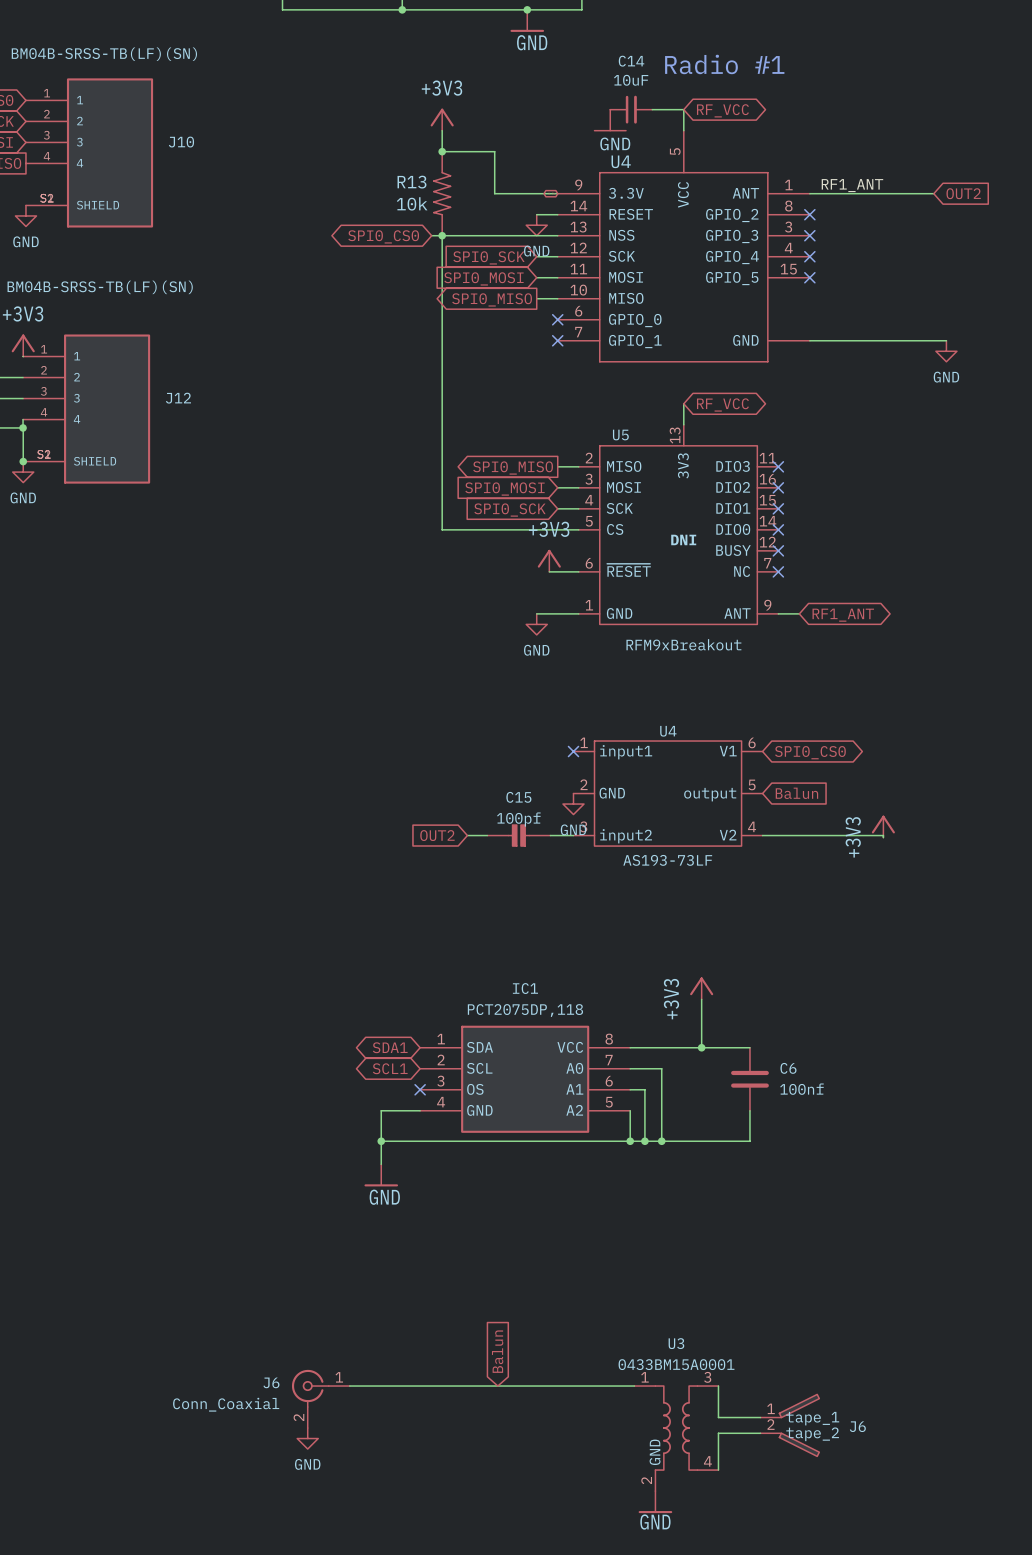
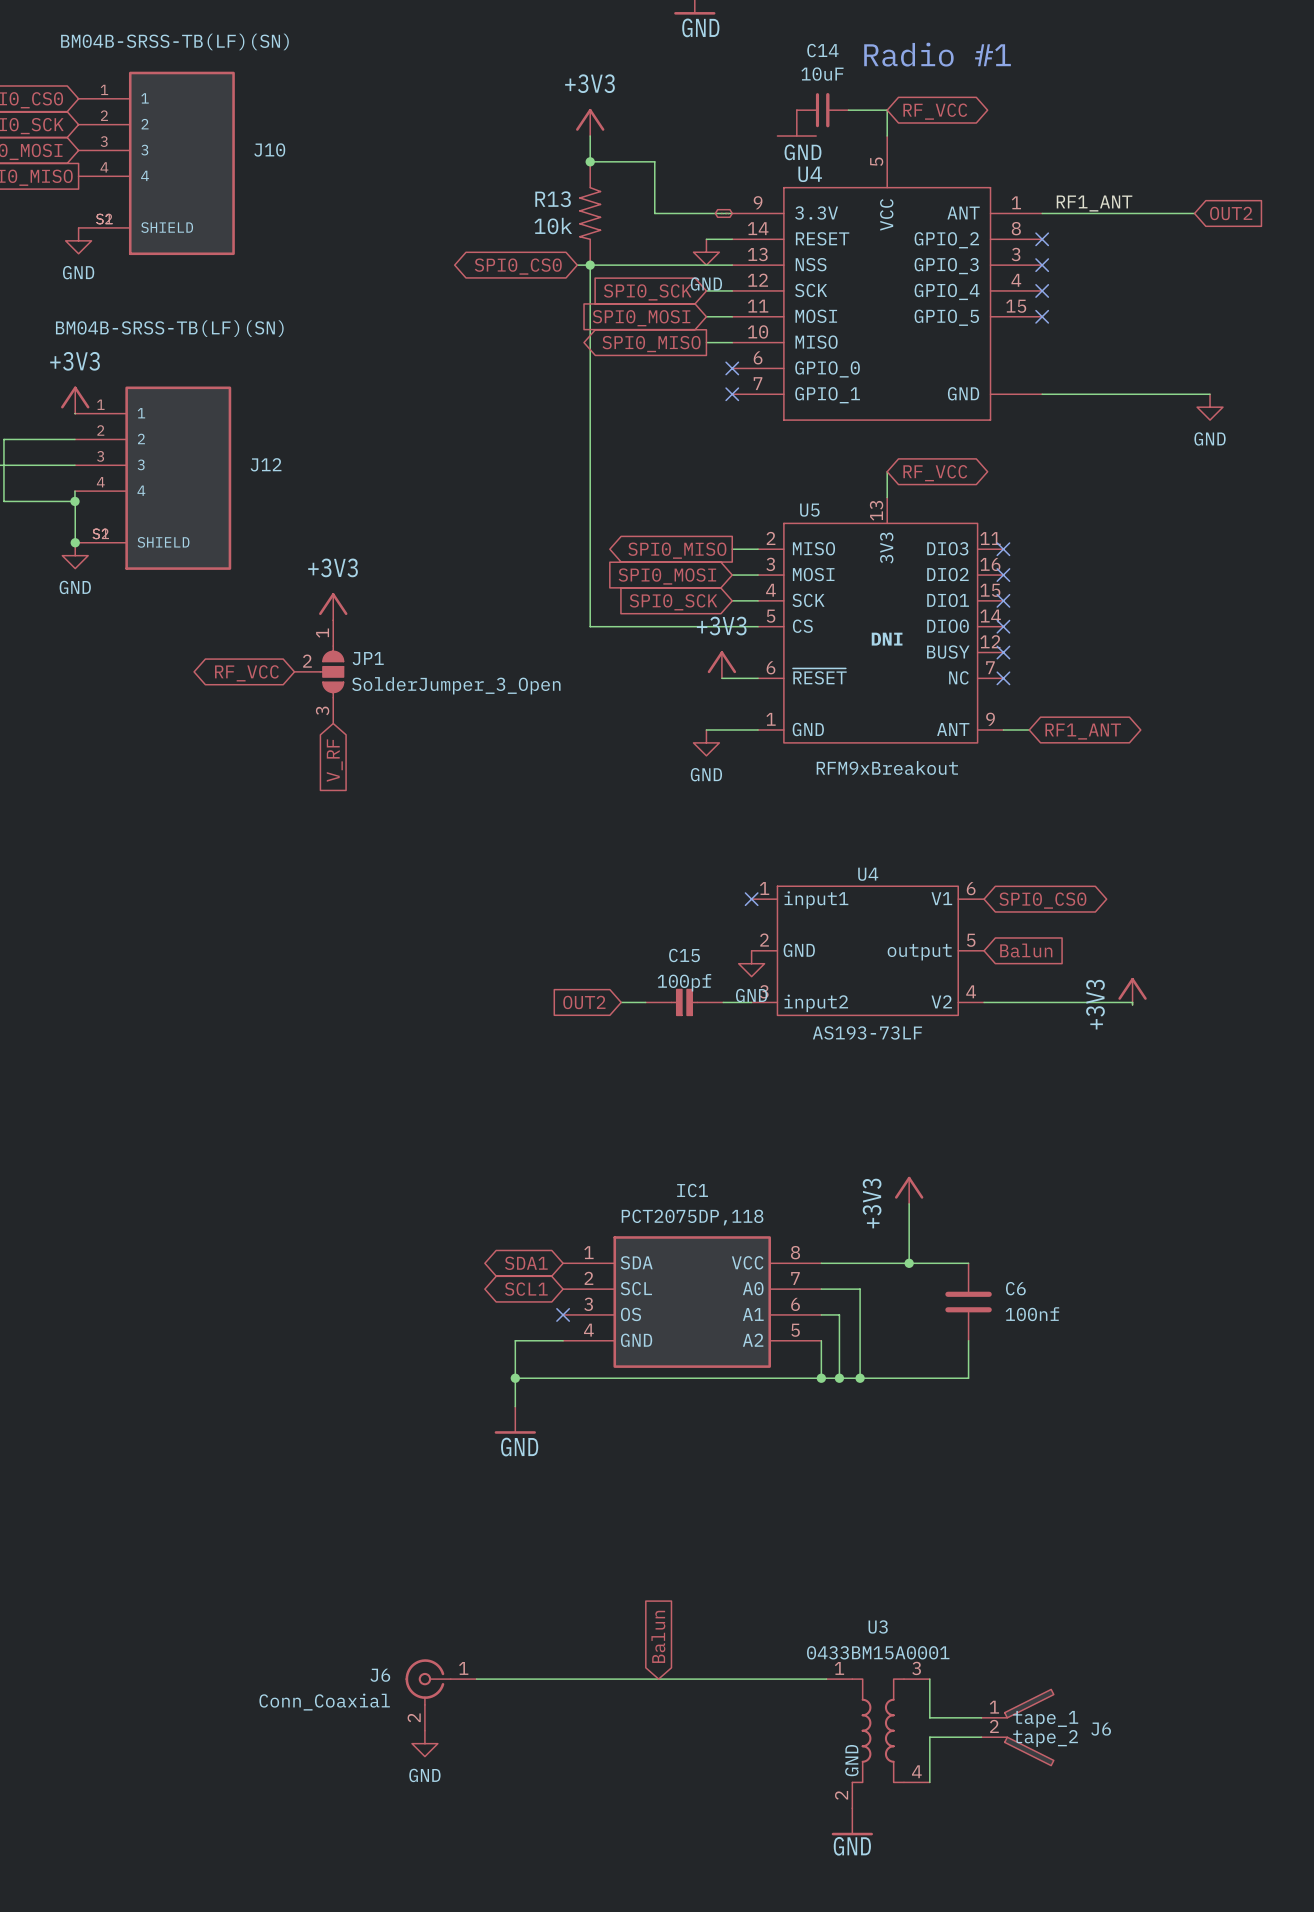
power symbol: none -> +3V3 (333, 606)
JP1: none -> SolderJumper_3_Open (319, 671)
global label: none -> RF_VCC (246, 673)
global label: none -> V_RF (334, 760)

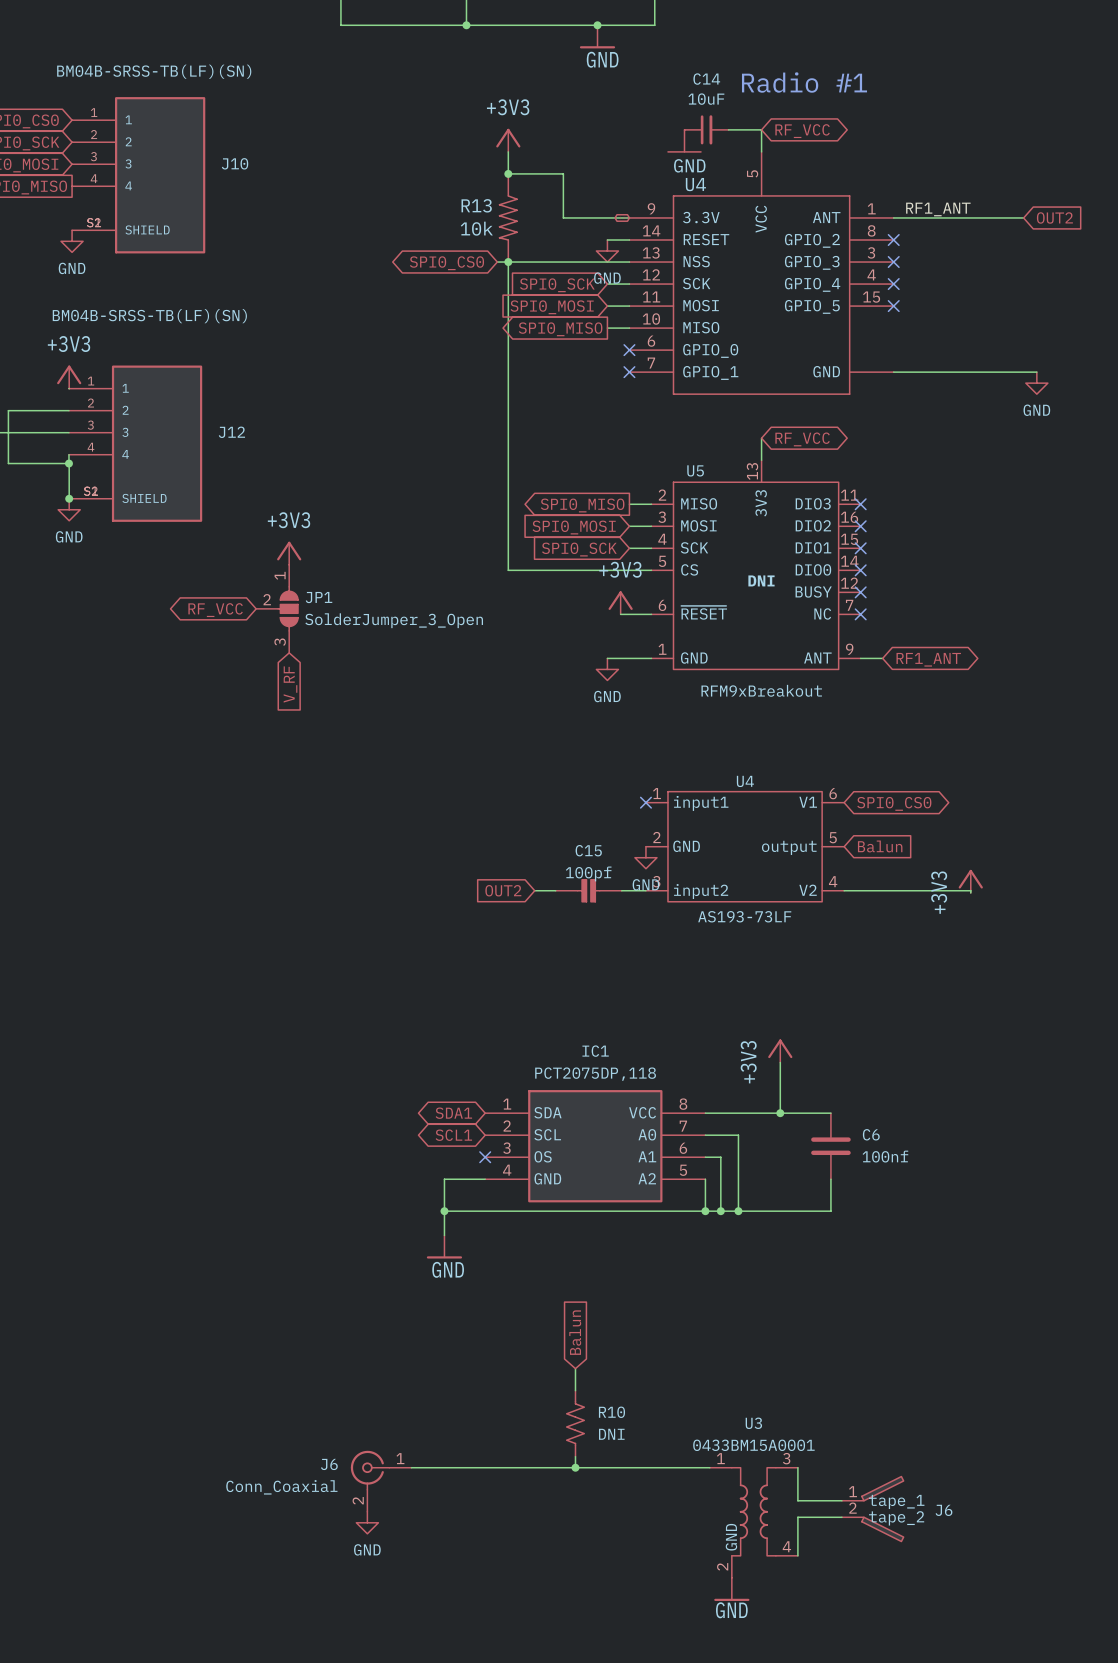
wire: none -> (575, 1368) (575, 1390)
R10: none -> DNI (575, 1423)
global label position: Balun (658, 1636) -> Balun (575, 1332)
wire: none -> (575, 1456) (575, 1467)
junction: none -> (575, 1467)

